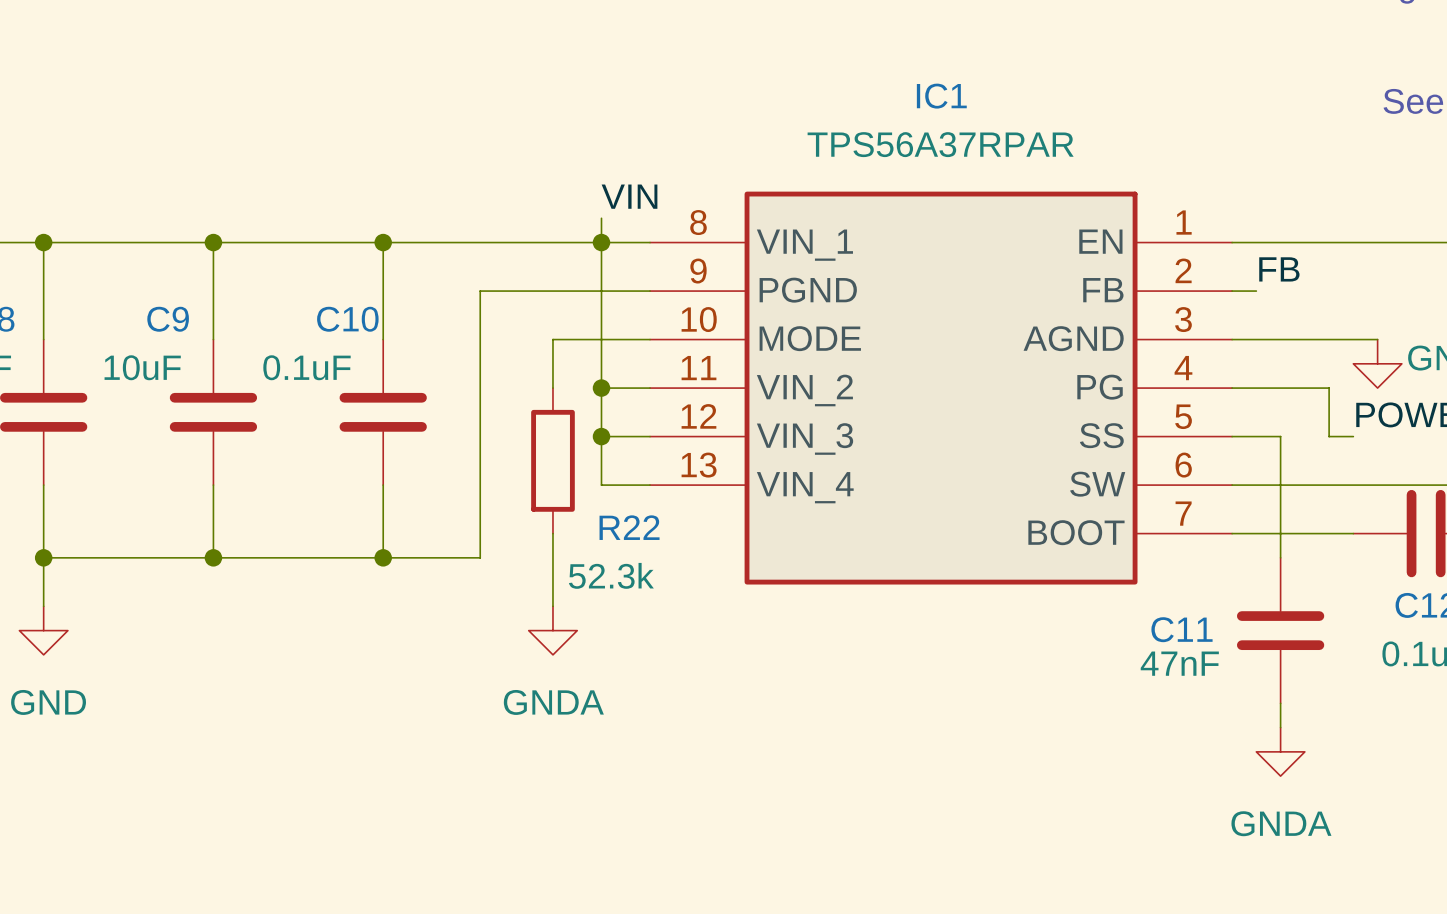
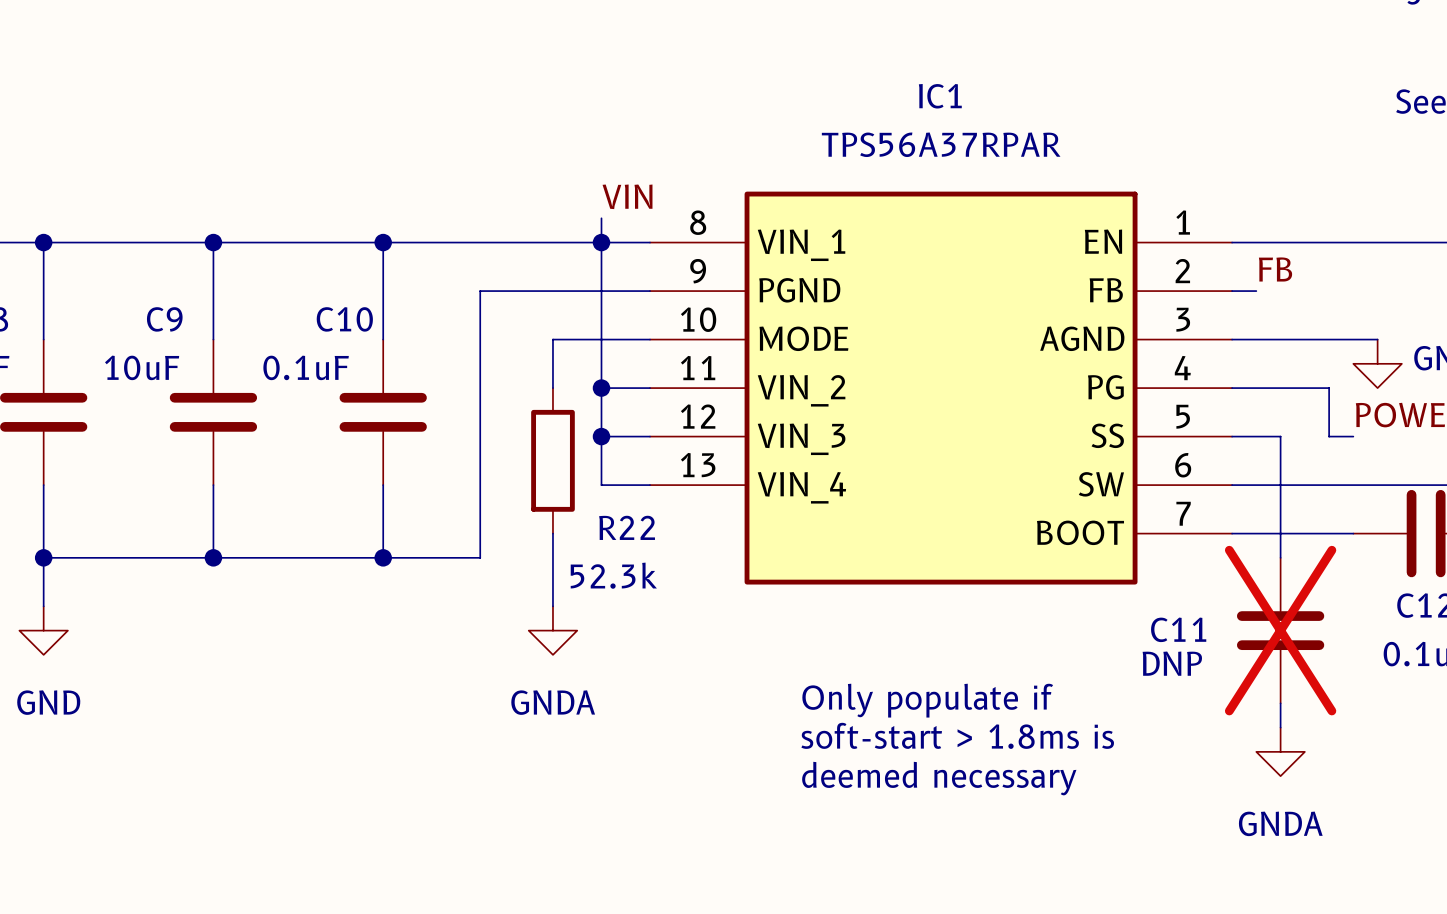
C11 do-not-place cross: none -> (1280, 630)
C11 value: 47nF (1179, 663) -> DNP (1172, 663)
text: none -> Only populate if (927, 700)
text: none -> soft-start > 1.8ms is (957, 735)
text: none -> deemed necessary (939, 778)

